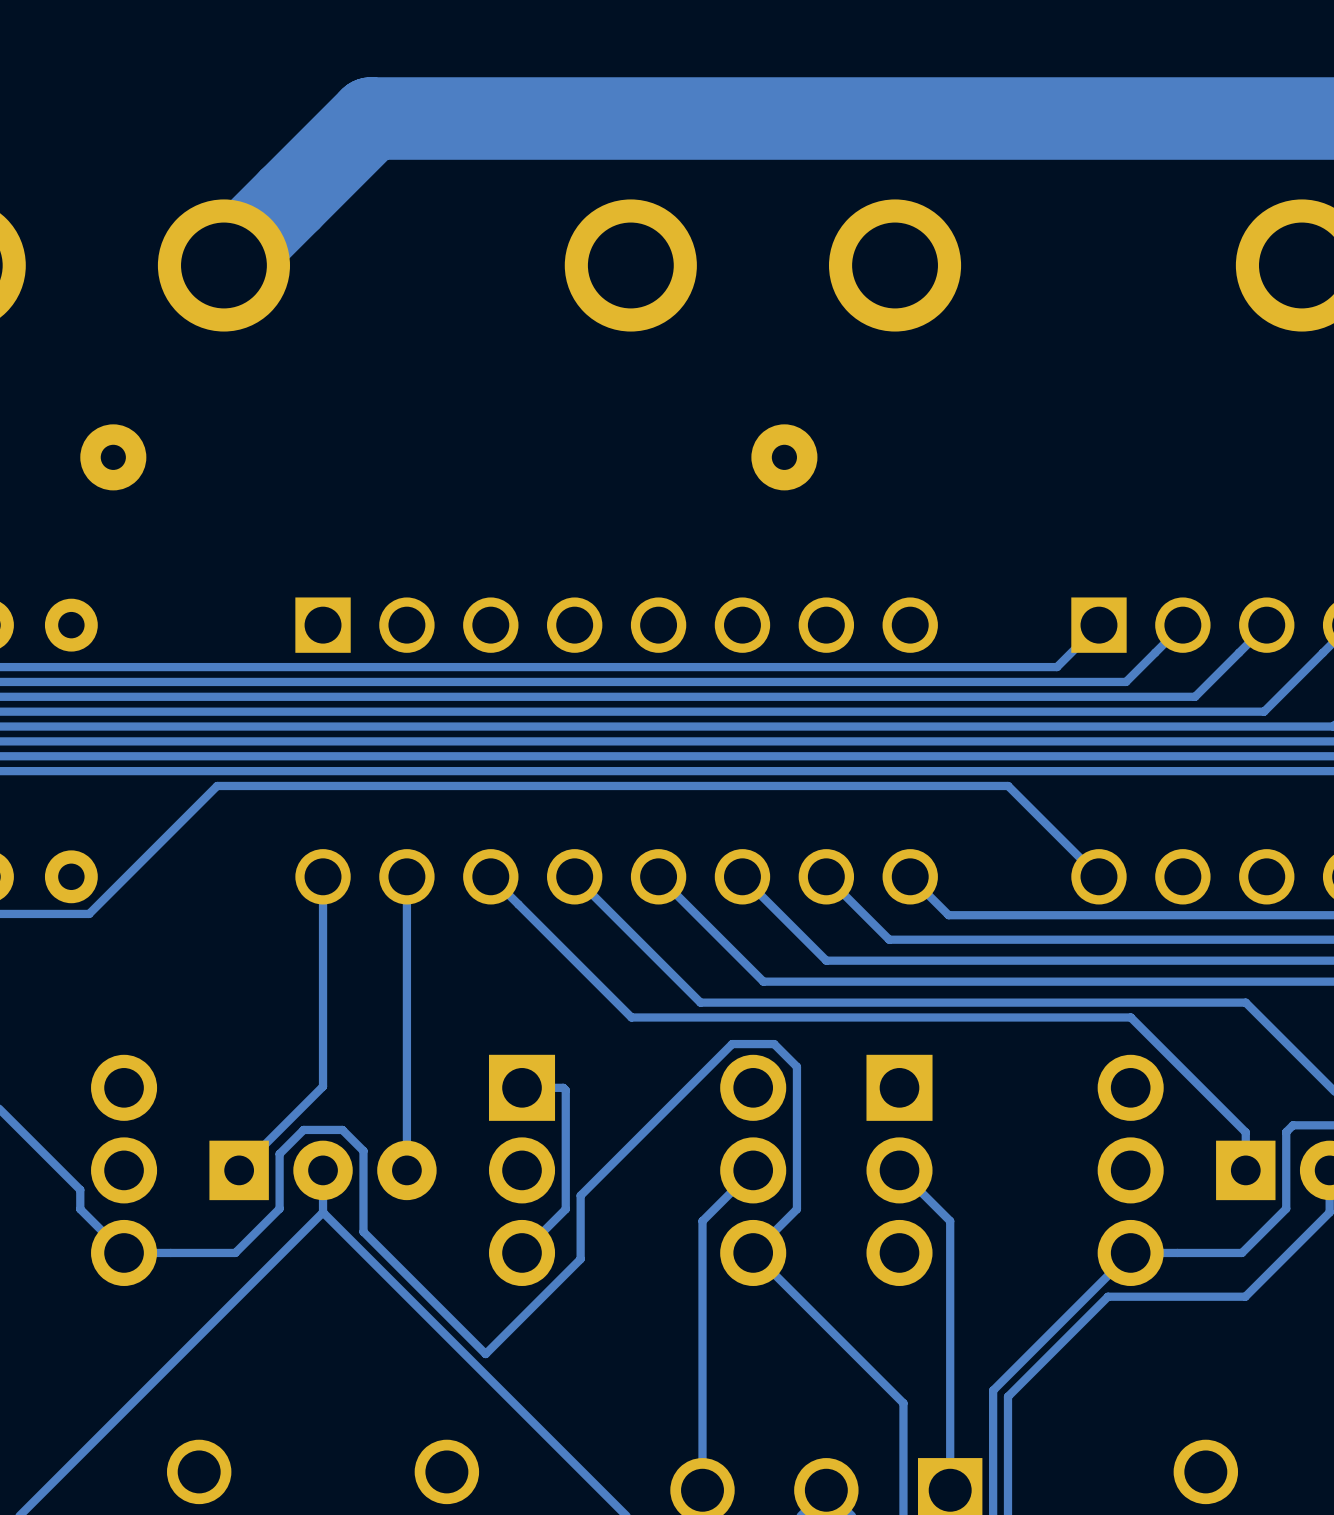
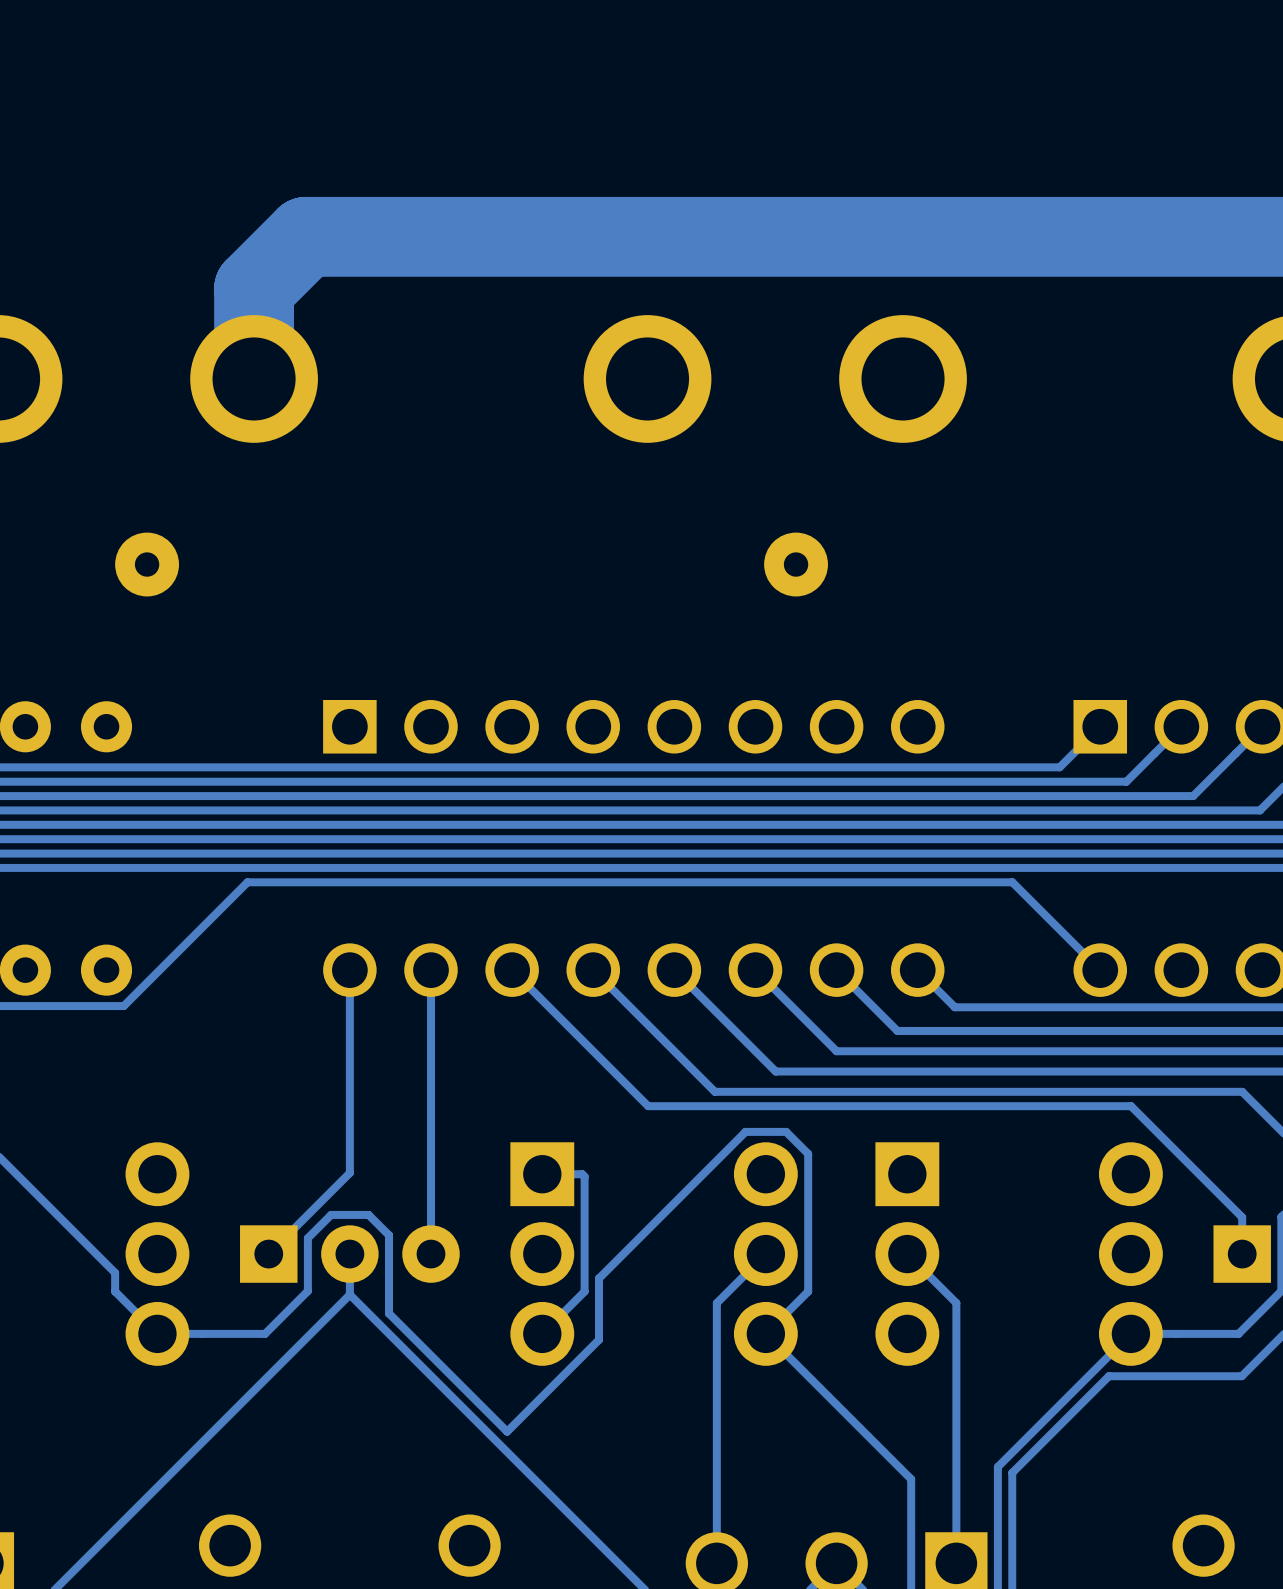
track: (370, 118) (223, 265) -> (396, 236) (305, 236) (254, 288) (254, 378)

